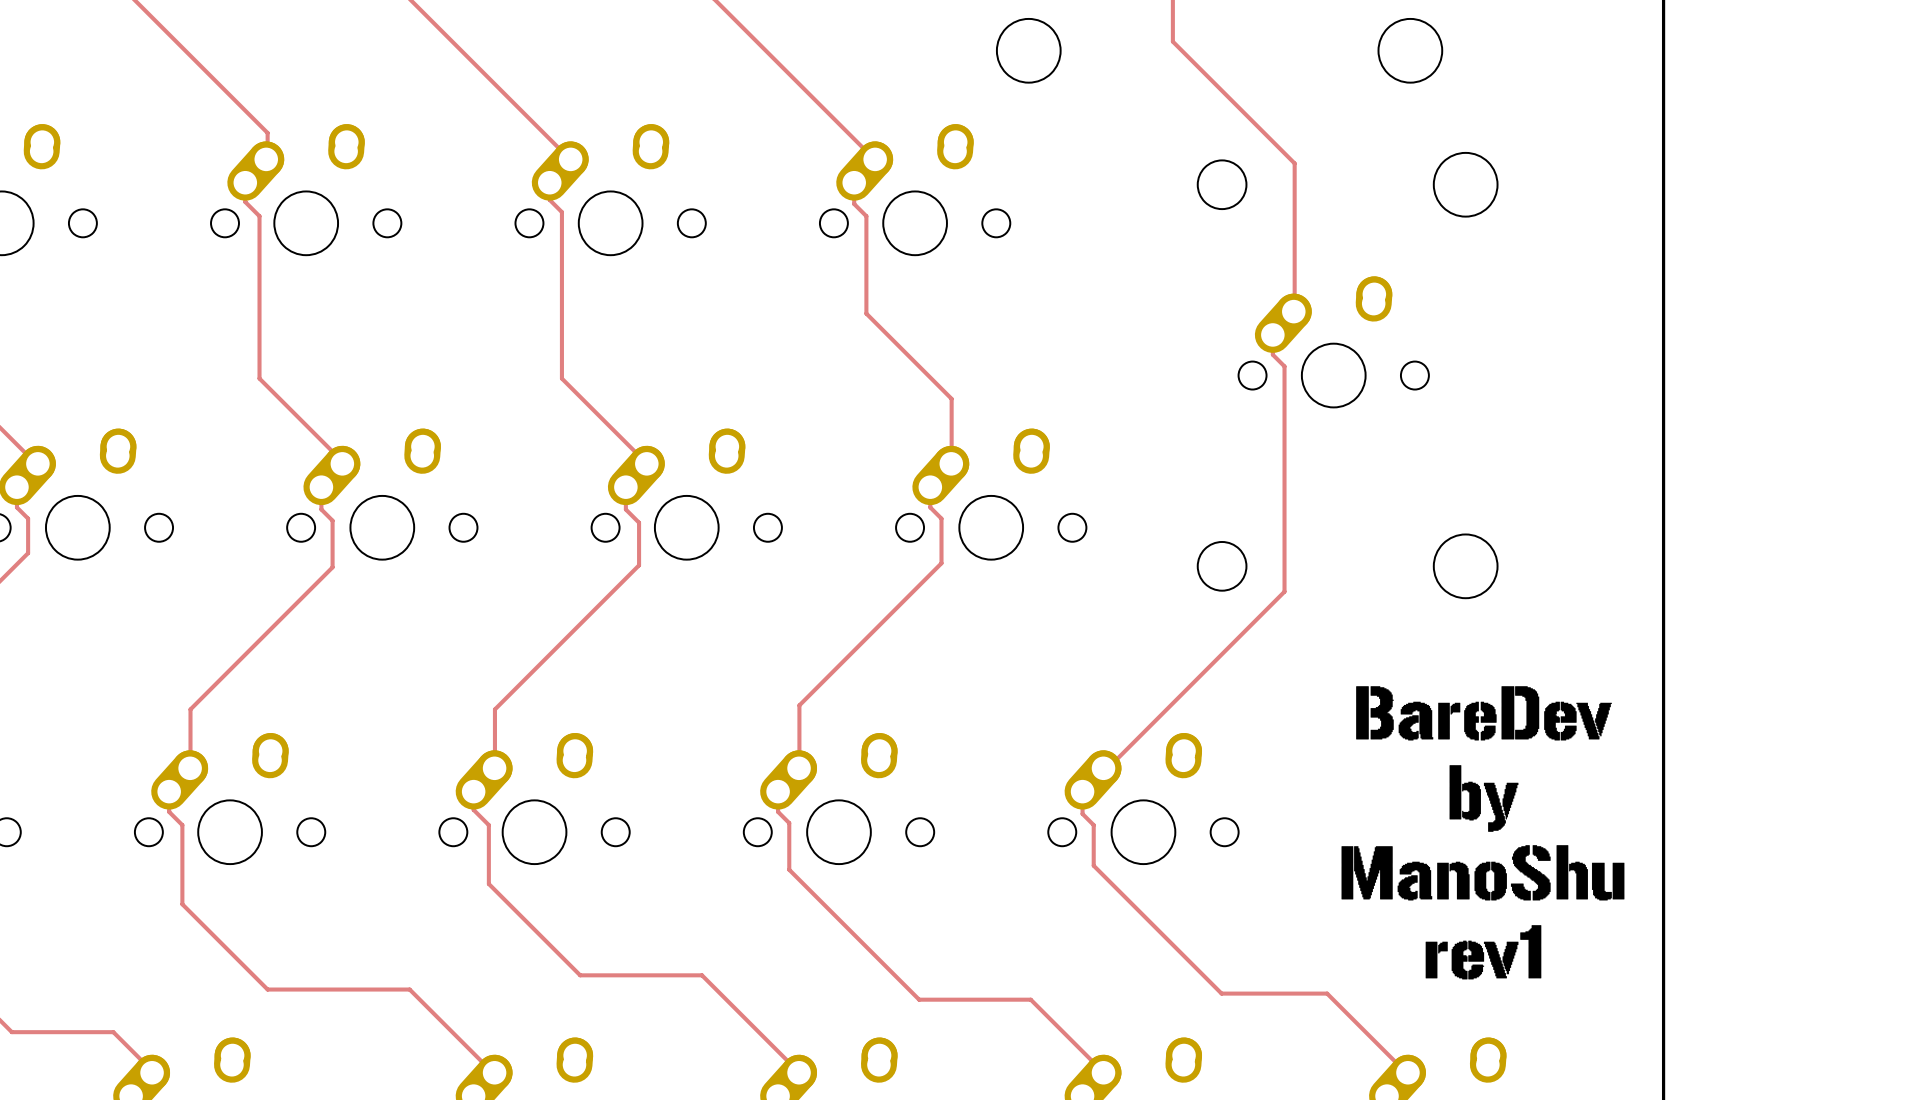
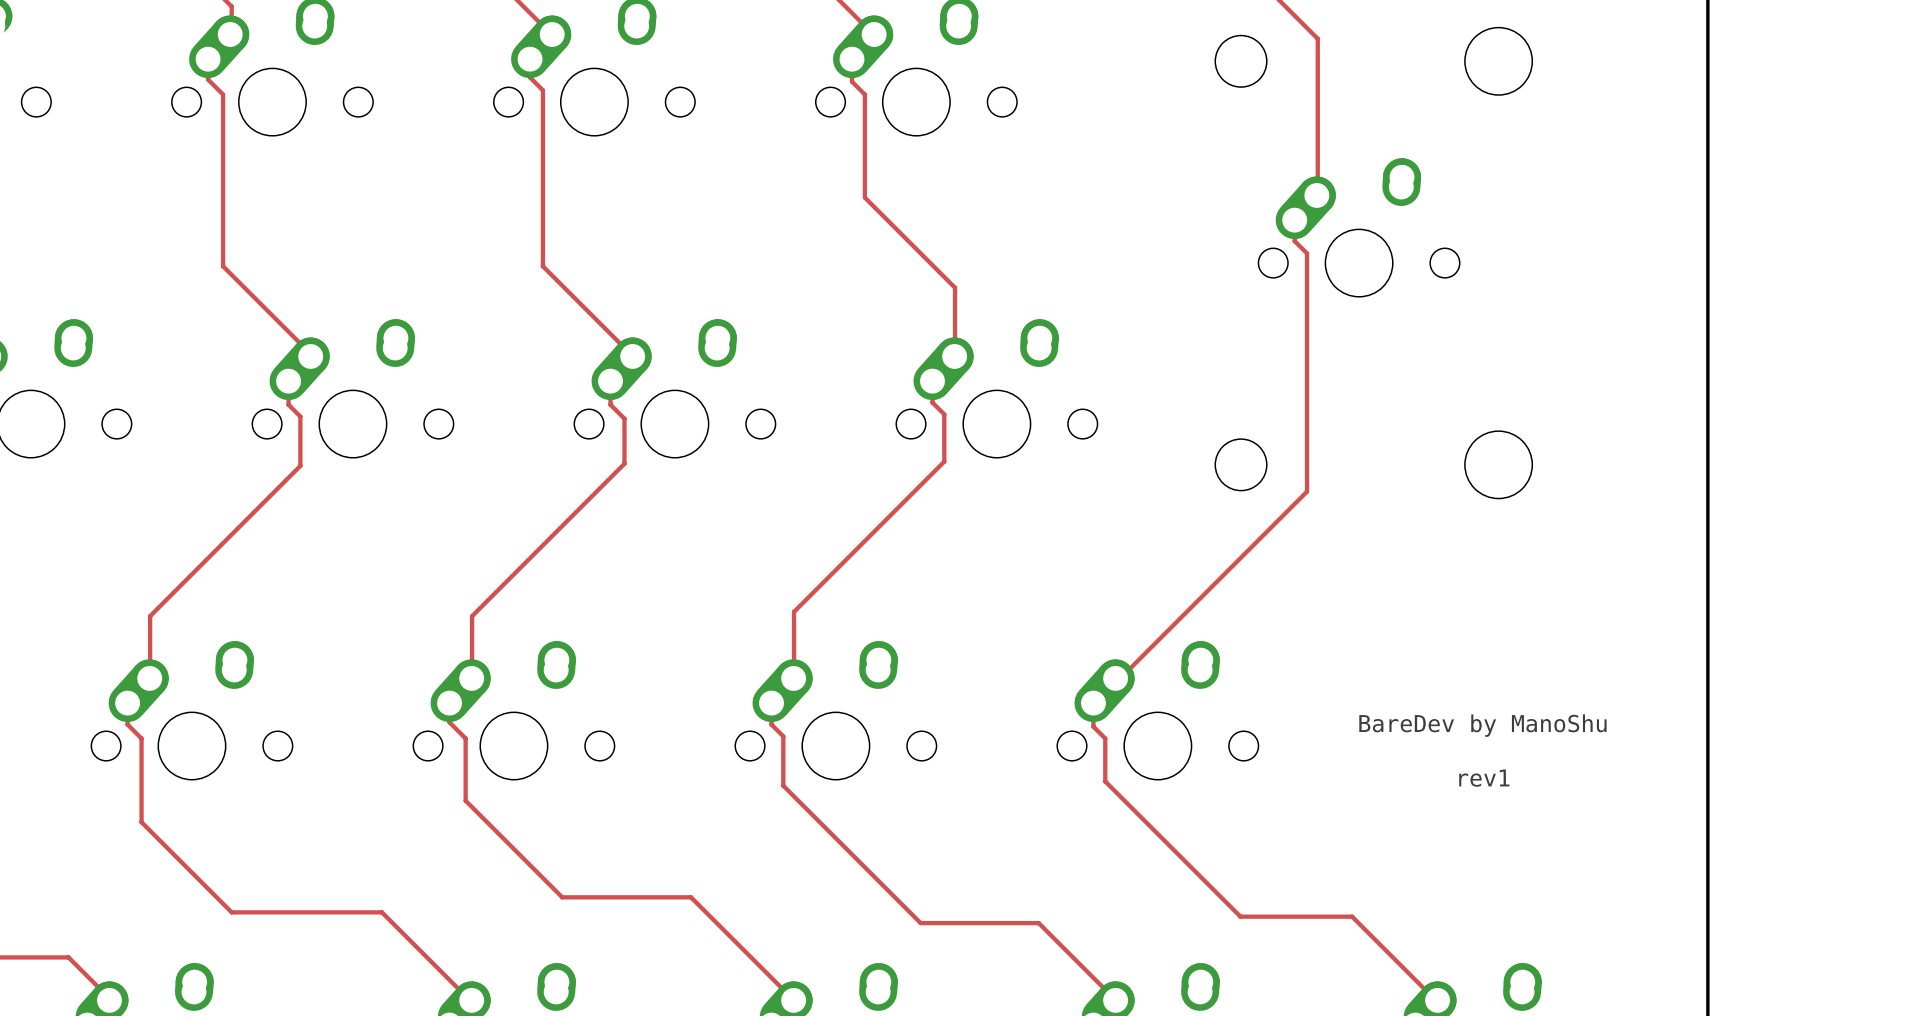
drawing: [1341, 686, 1625, 980] -> none
text: none -> BareDev by ManoShu (1482, 725)
text: none -> rev1 (1484, 778)

